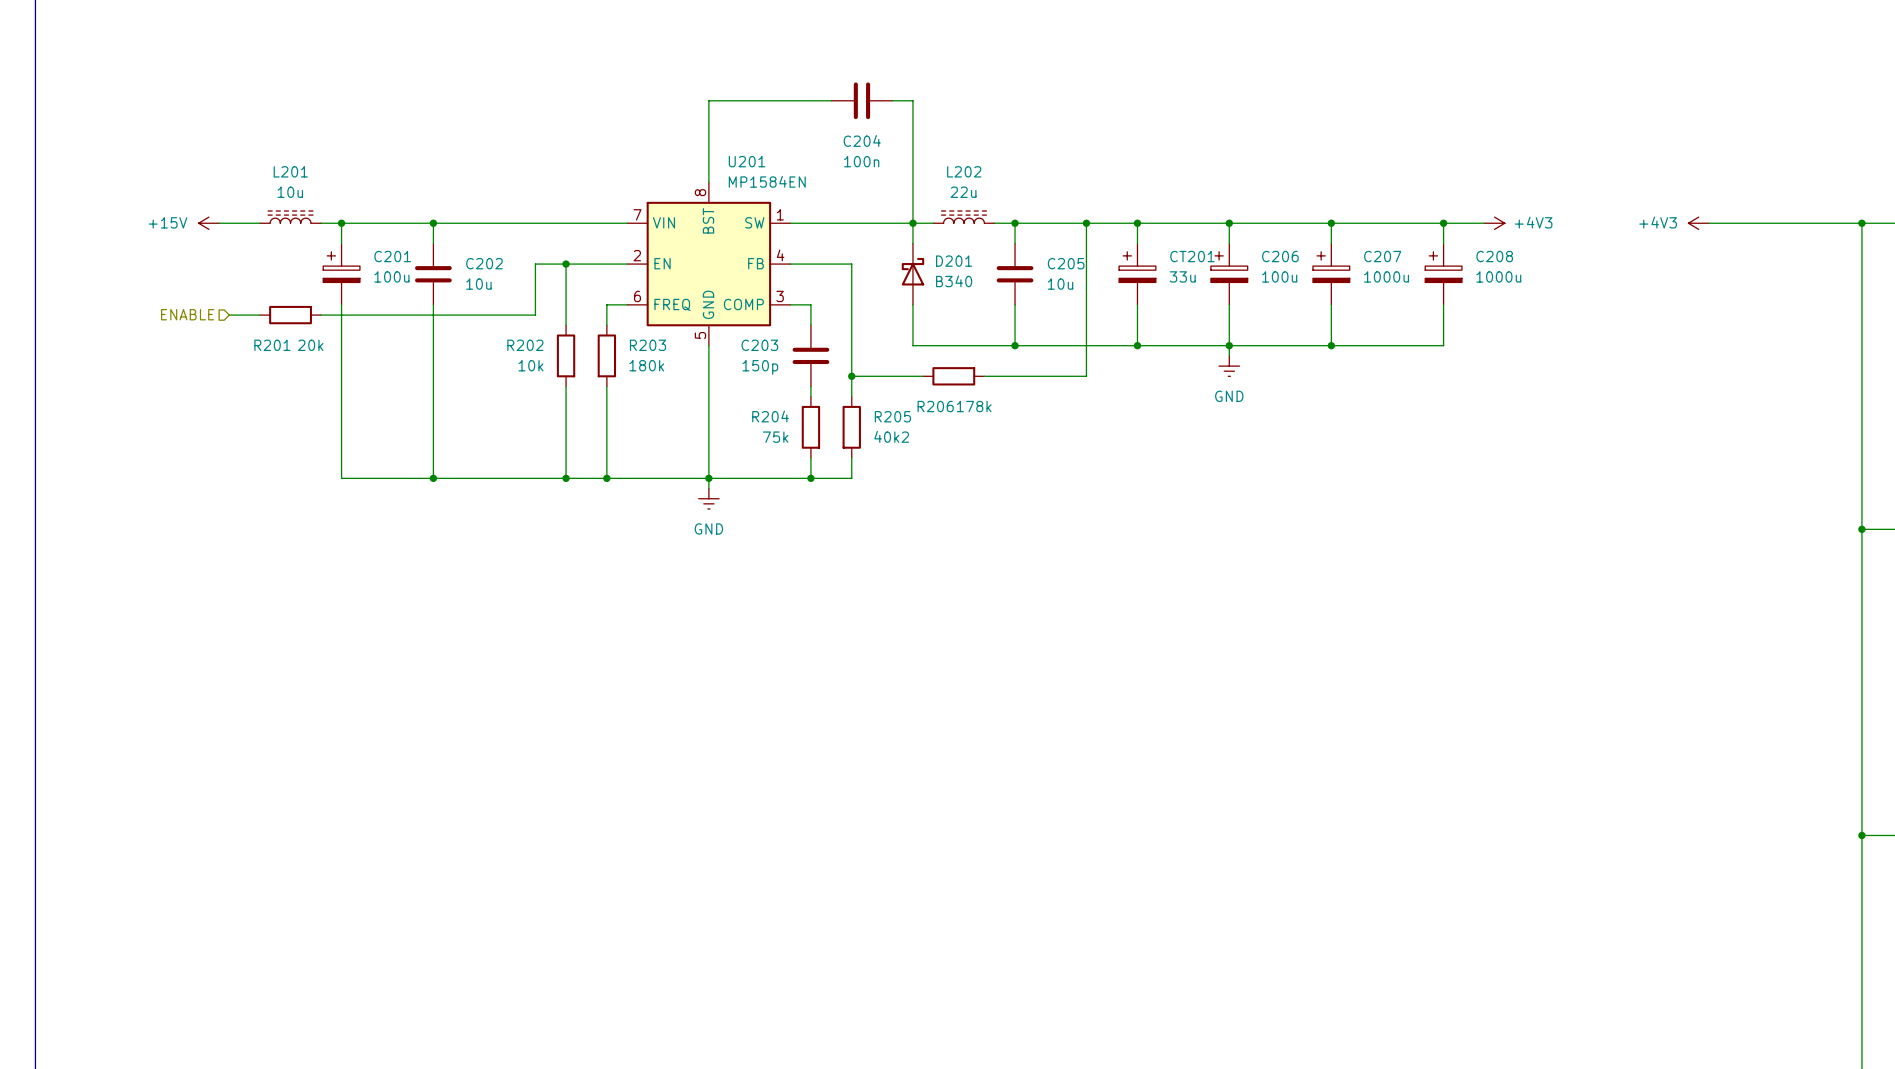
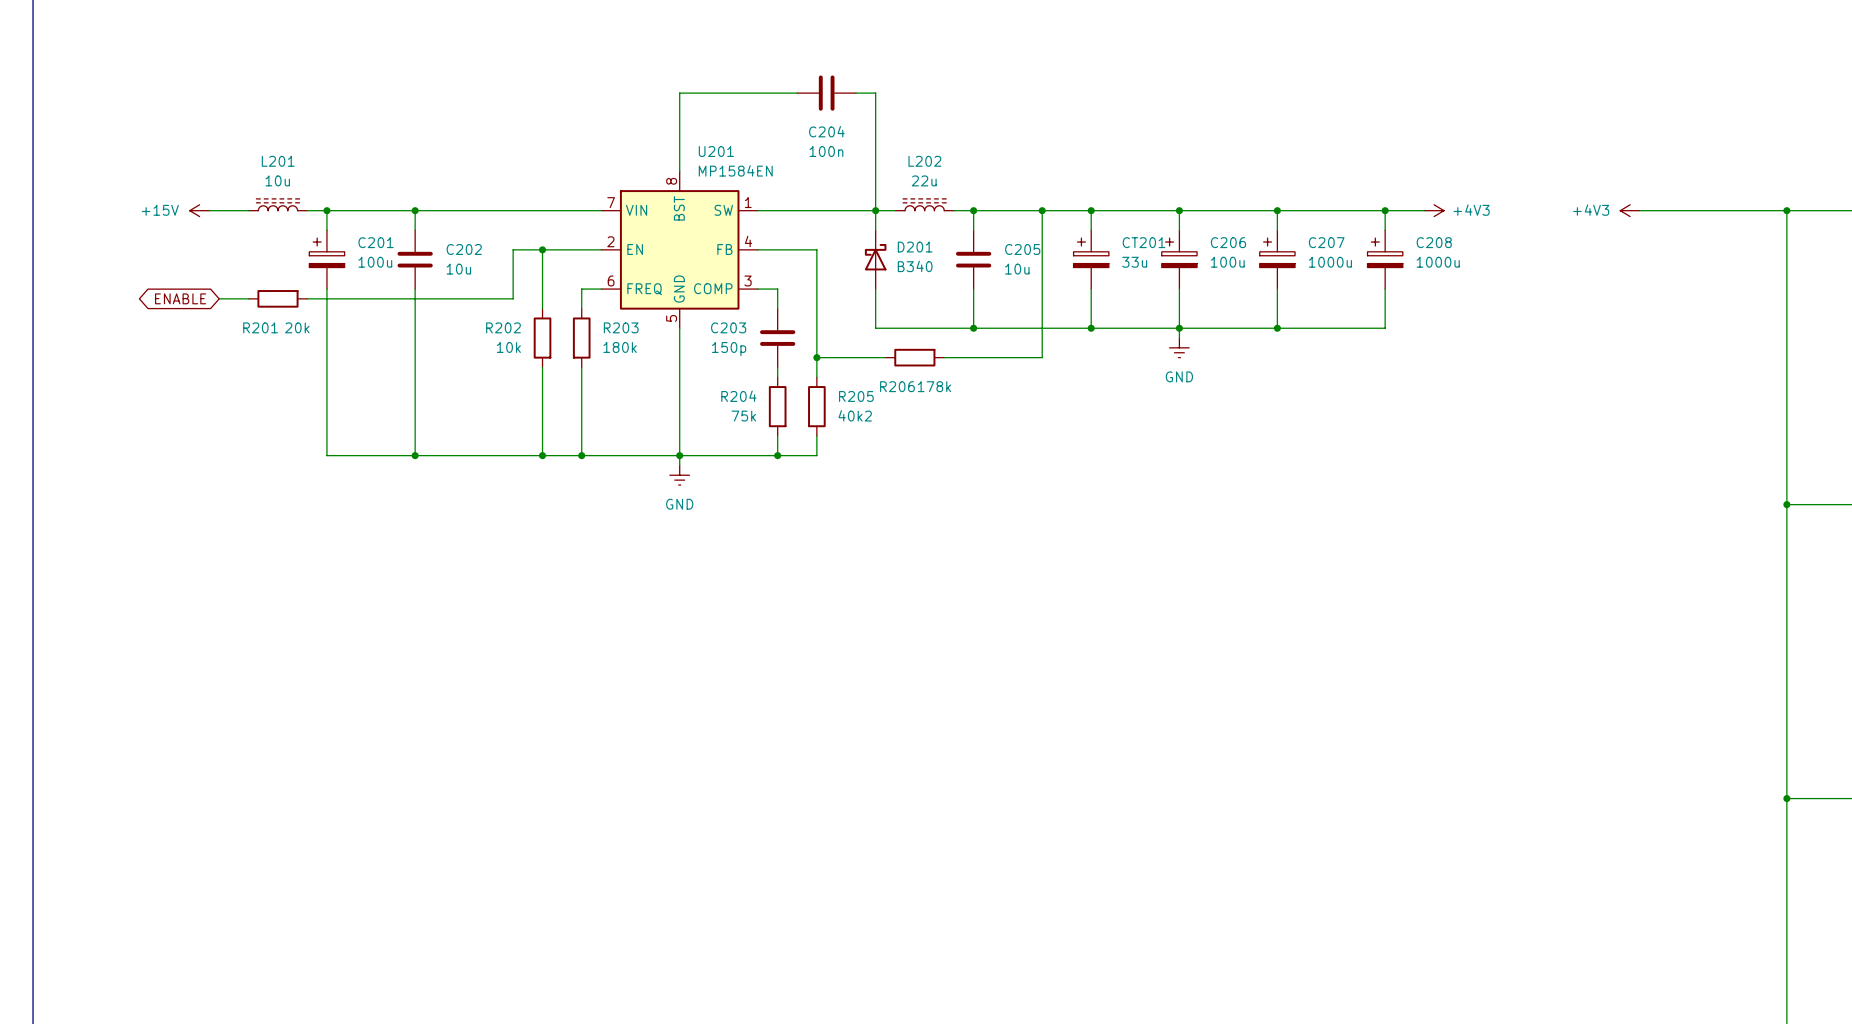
hierarchical label: ENABLE (187, 314) -> none
global label: none -> ENABLE (180, 298)

